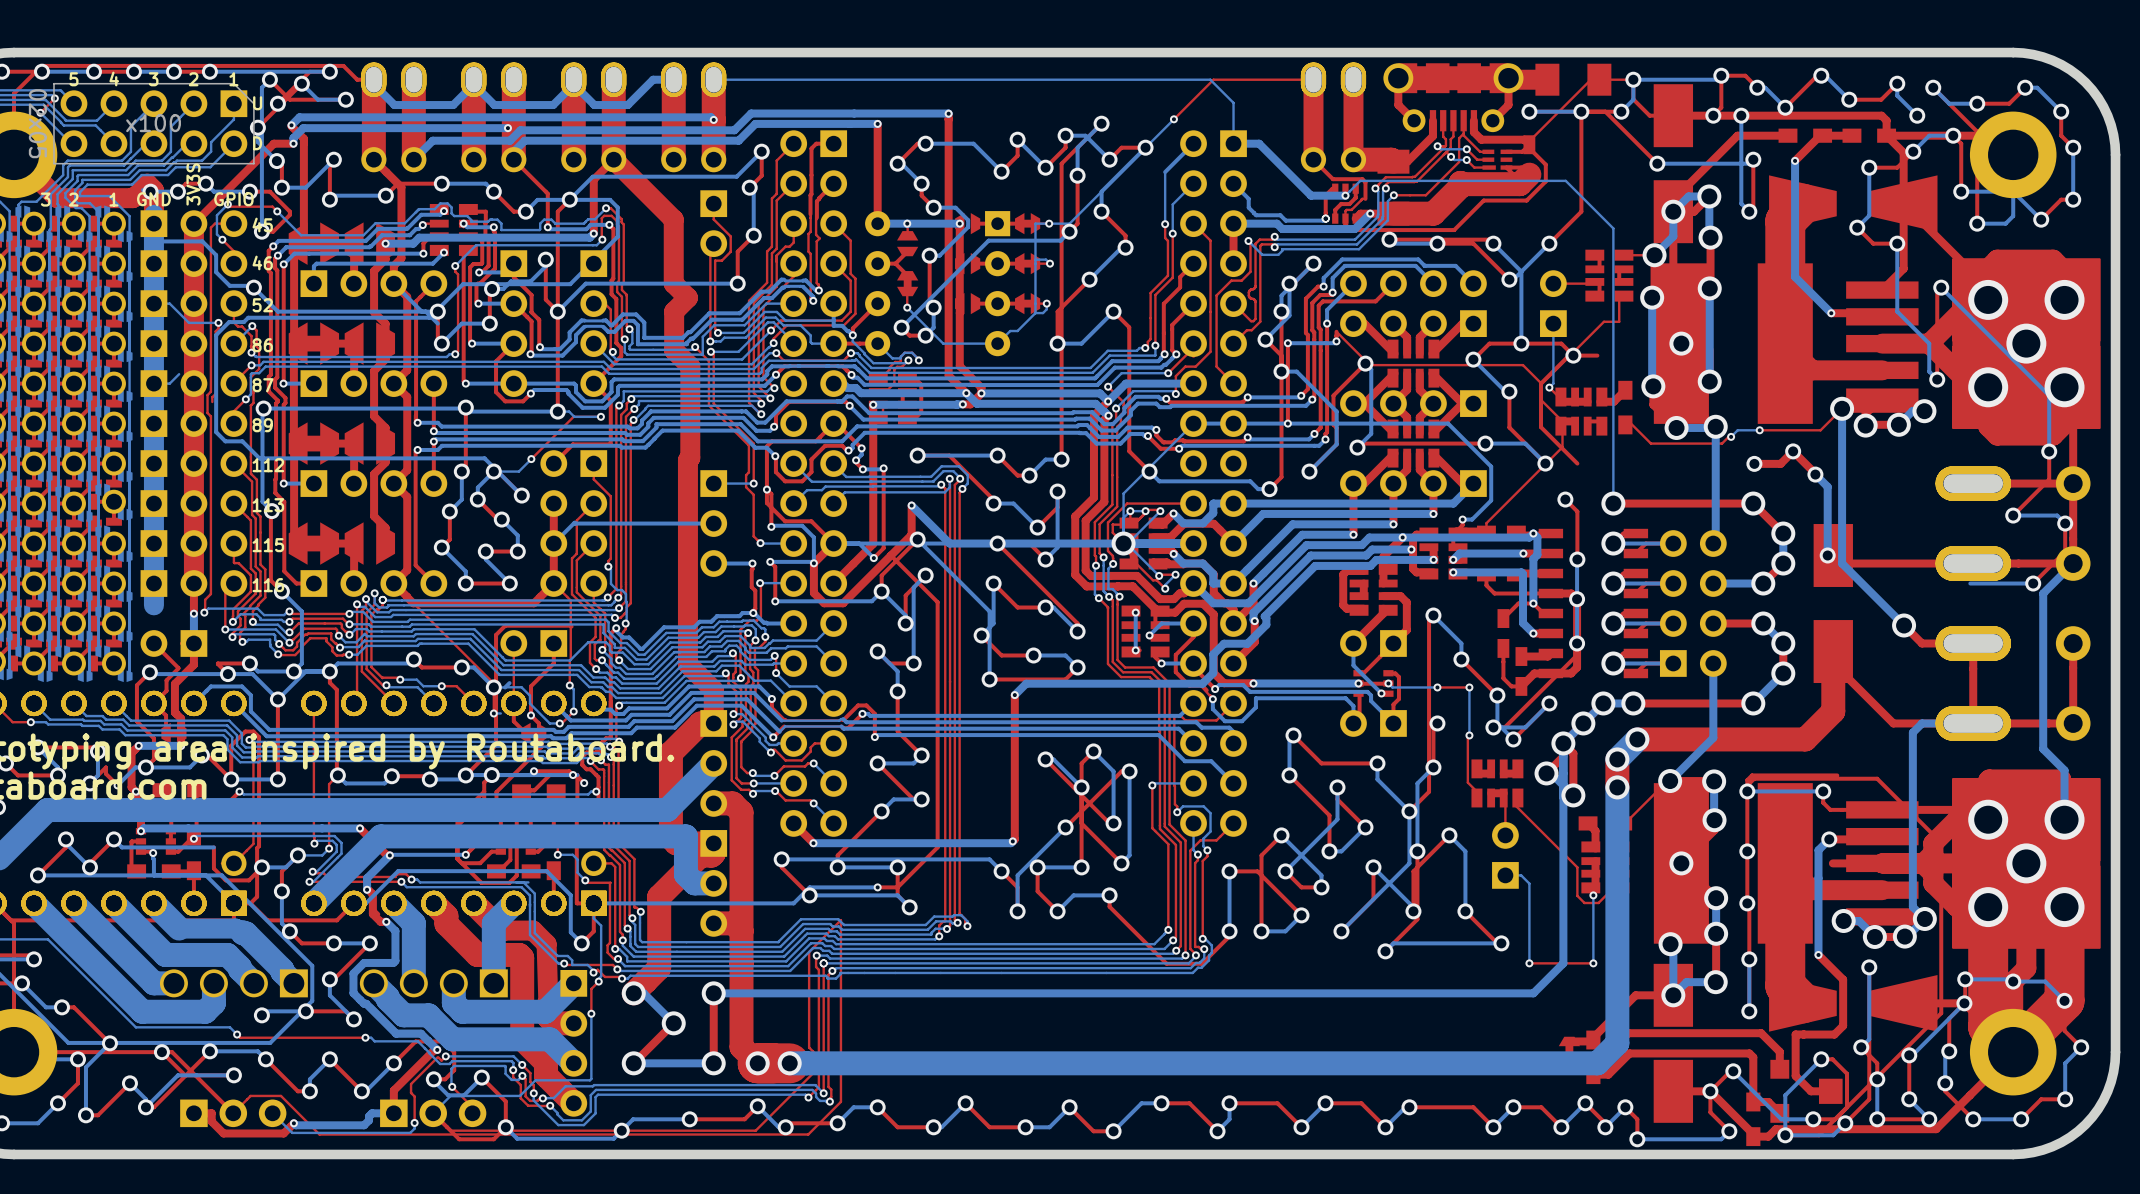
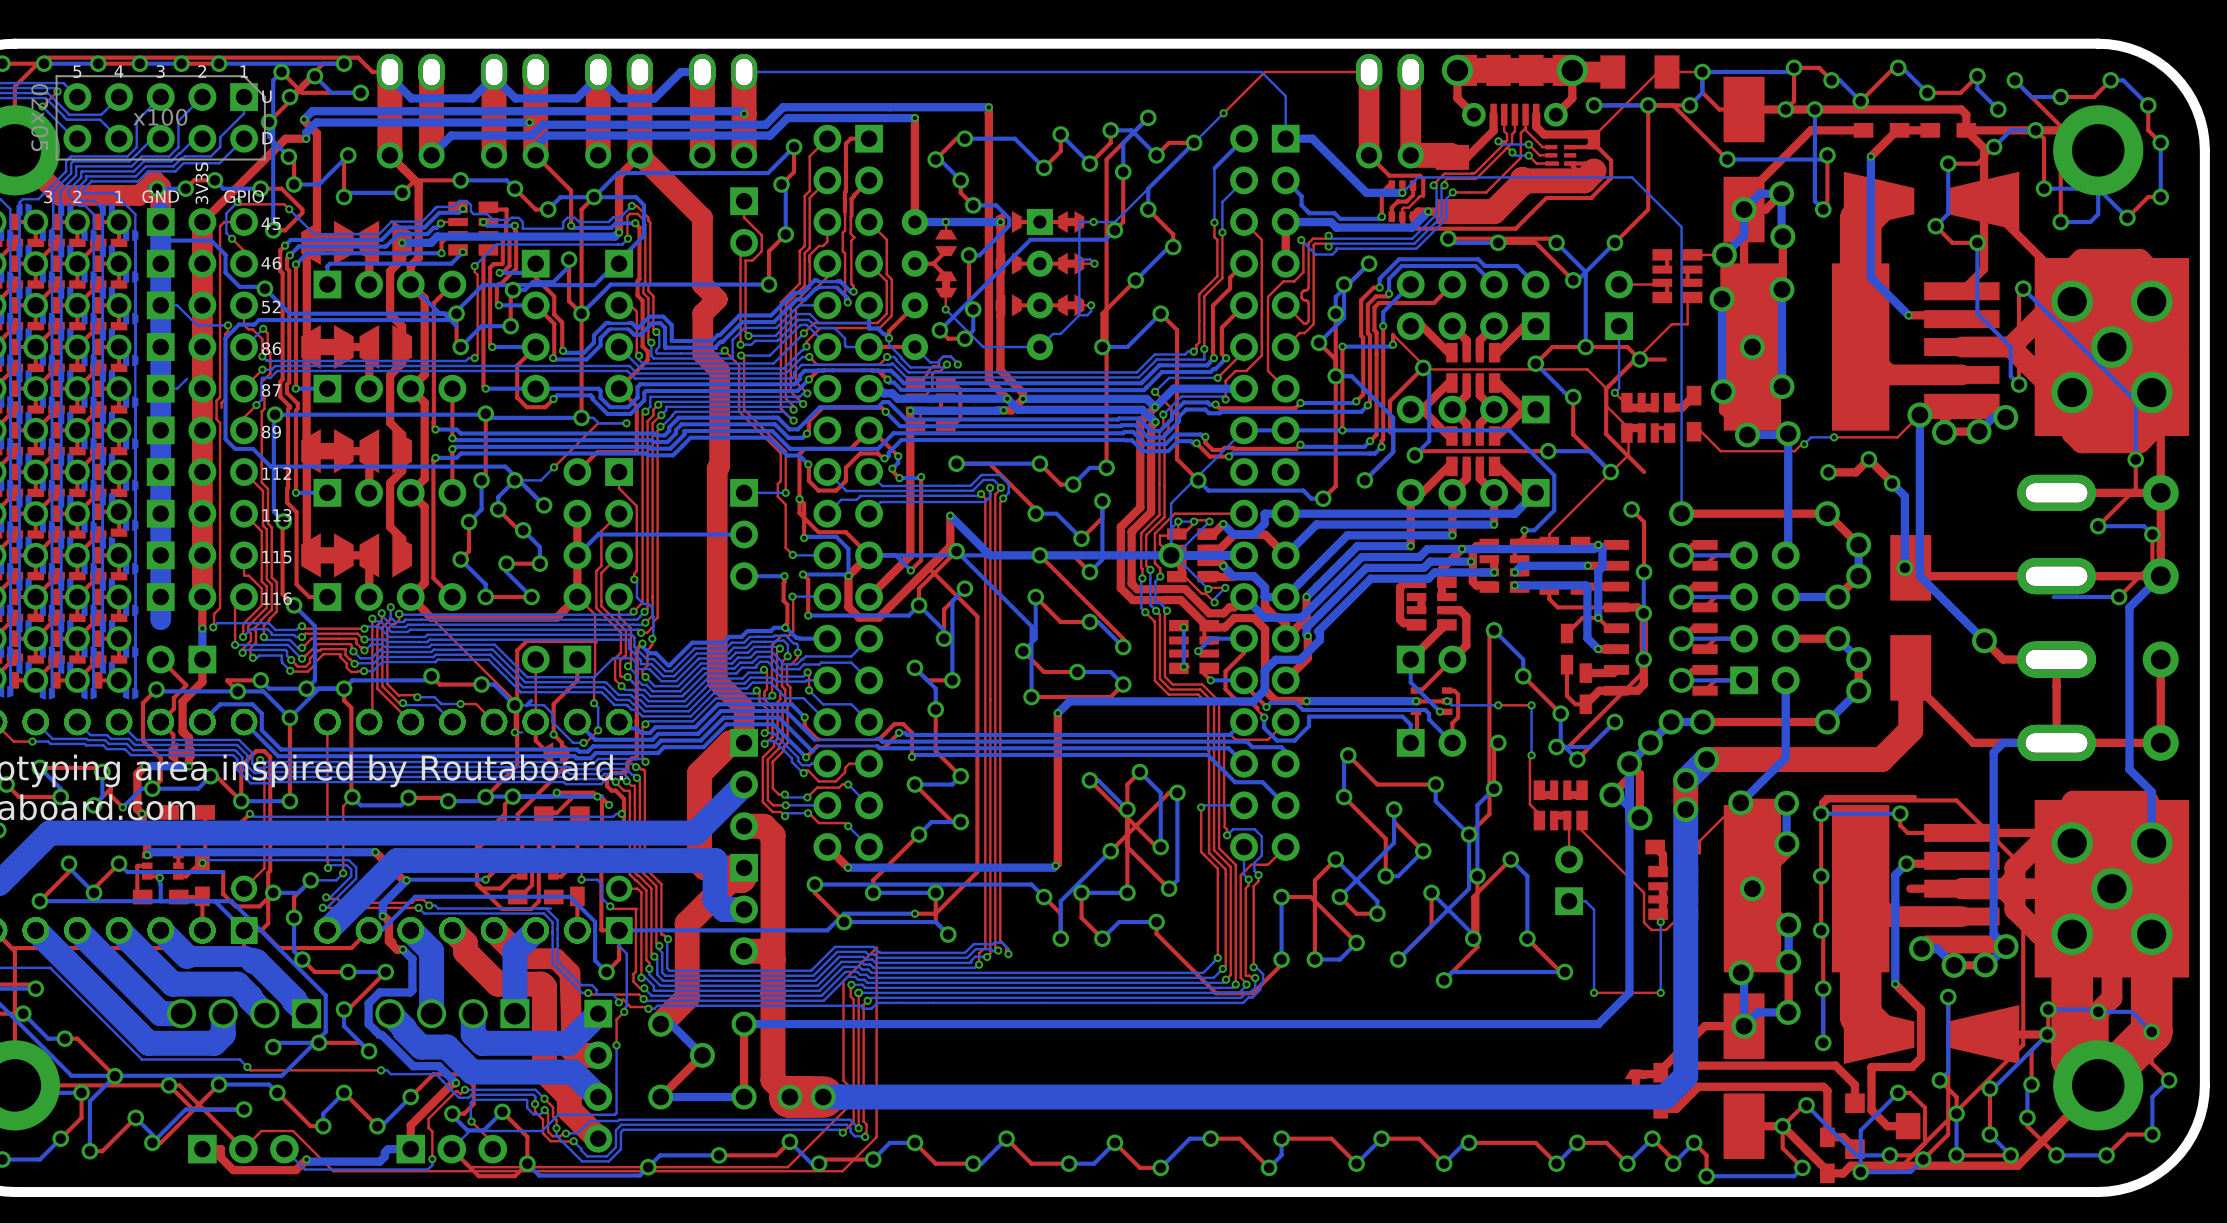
part rotation: 0° (1373, 643) -> 180° (1431, 659)
part rotation: 0° (1373, 723) -> 180° (1431, 742)

